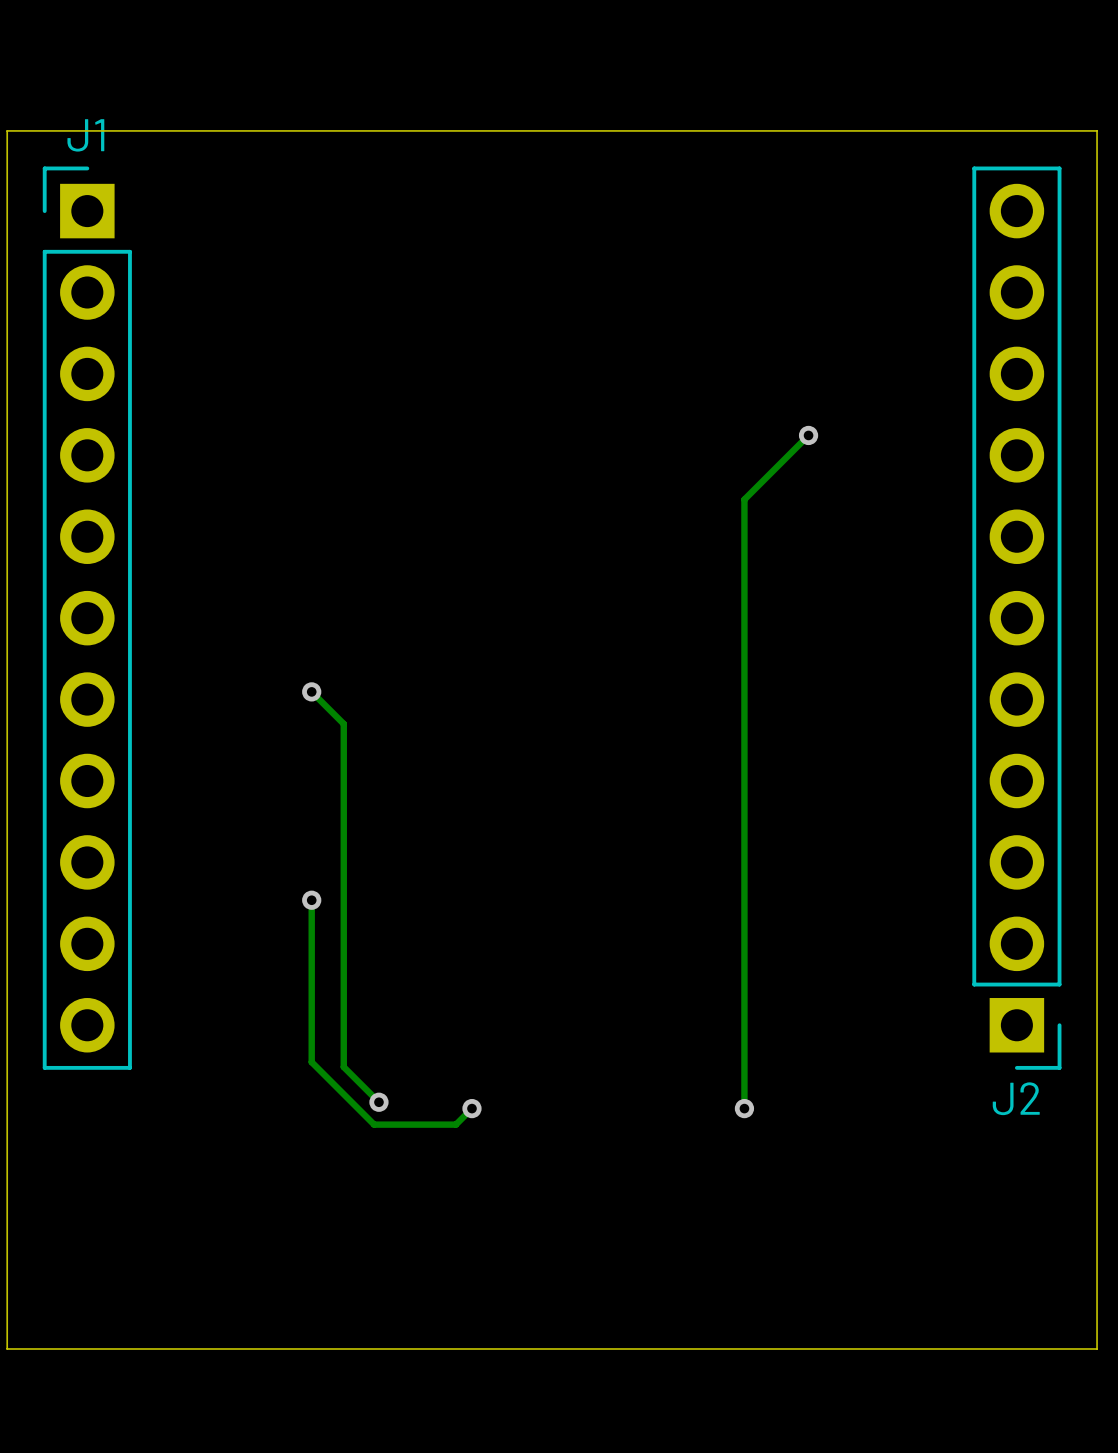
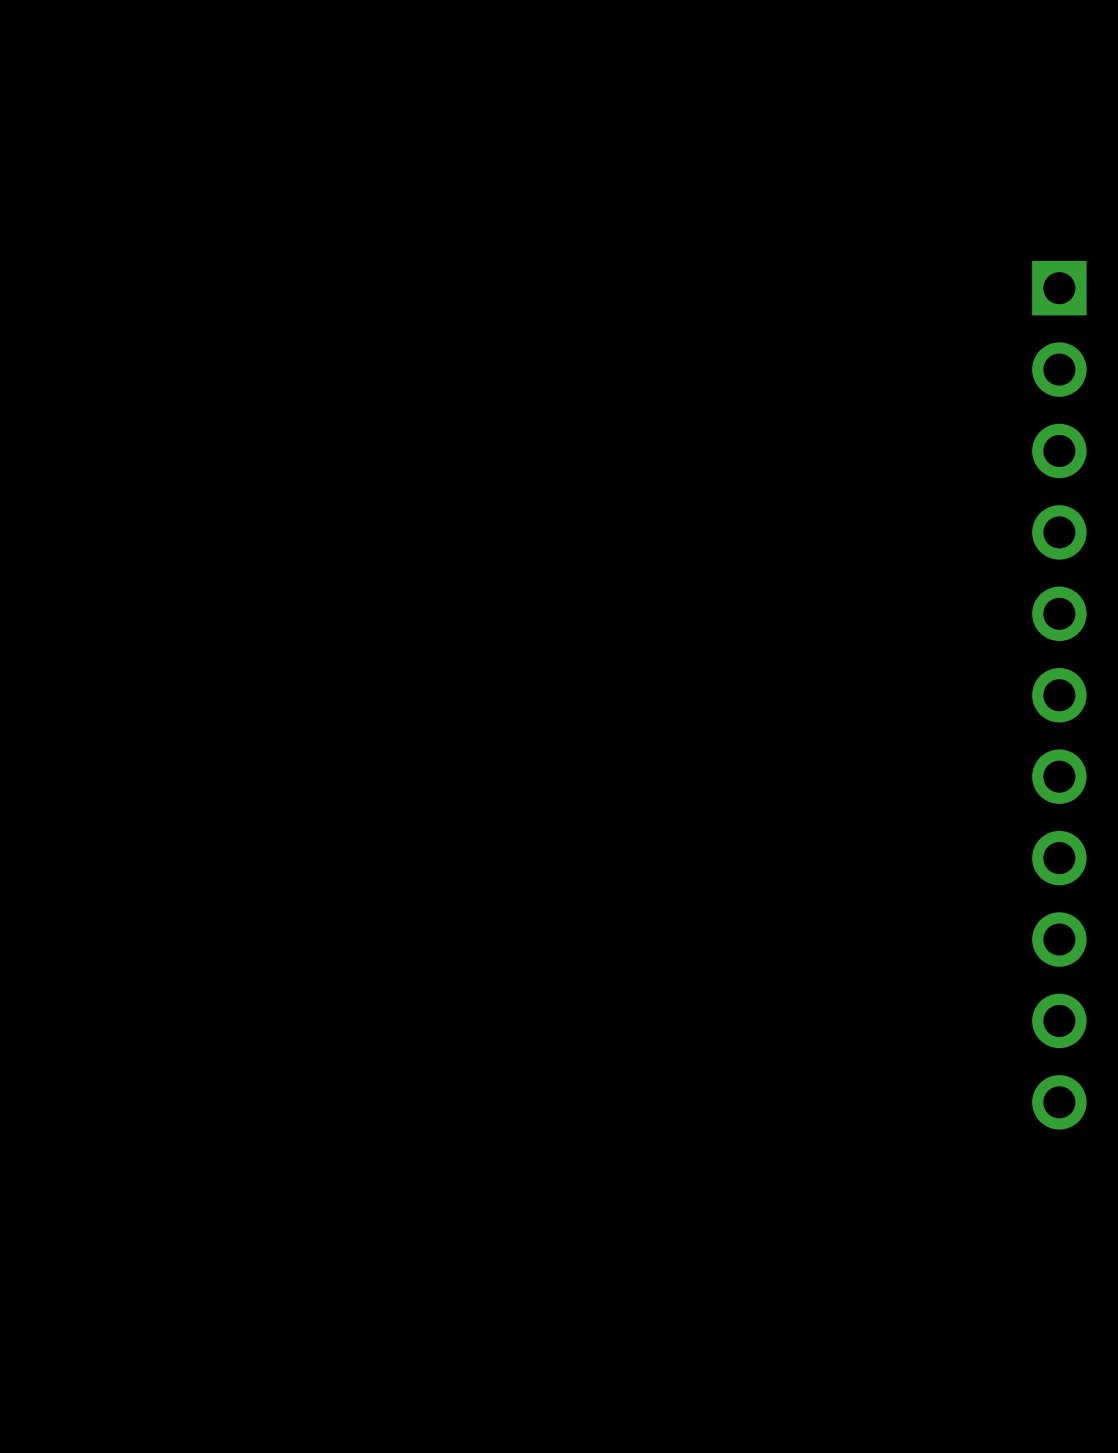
board edge: (1097, 130) (7, 130) (7, 1349) (1097, 1349) (1097, 130) -> none
track: (808, 435) (744, 499) (744, 1108) -> none
via: (808, 435) -> none
J1: (87, 618) -> none
J2 side: bottom (1016, 618) -> top (1059, 695)
track: (311, 691) (343, 723) (343, 1067) (378, 1102) -> none
via: (311, 691) -> none
track: (311, 900) (311, 1062) (374, 1124) (455, 1124) (471, 1108) -> none
via: (311, 900) -> none
via: (378, 1102) -> none
via: (471, 1108) -> none
via: (744, 1108) -> none

